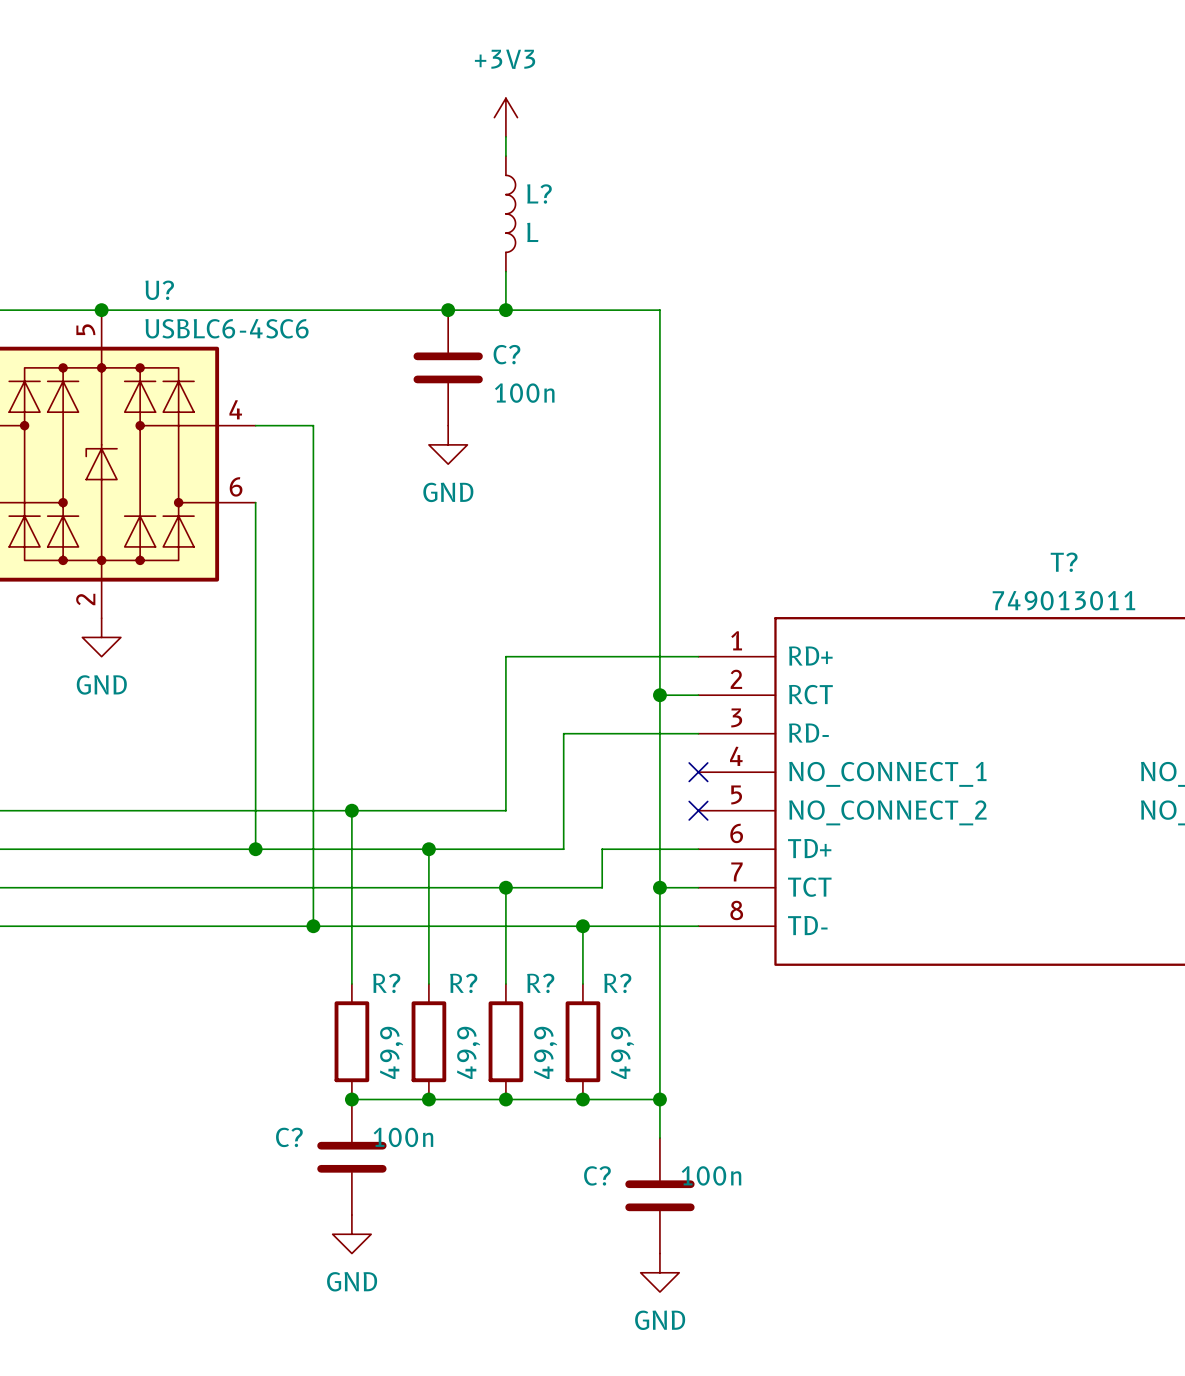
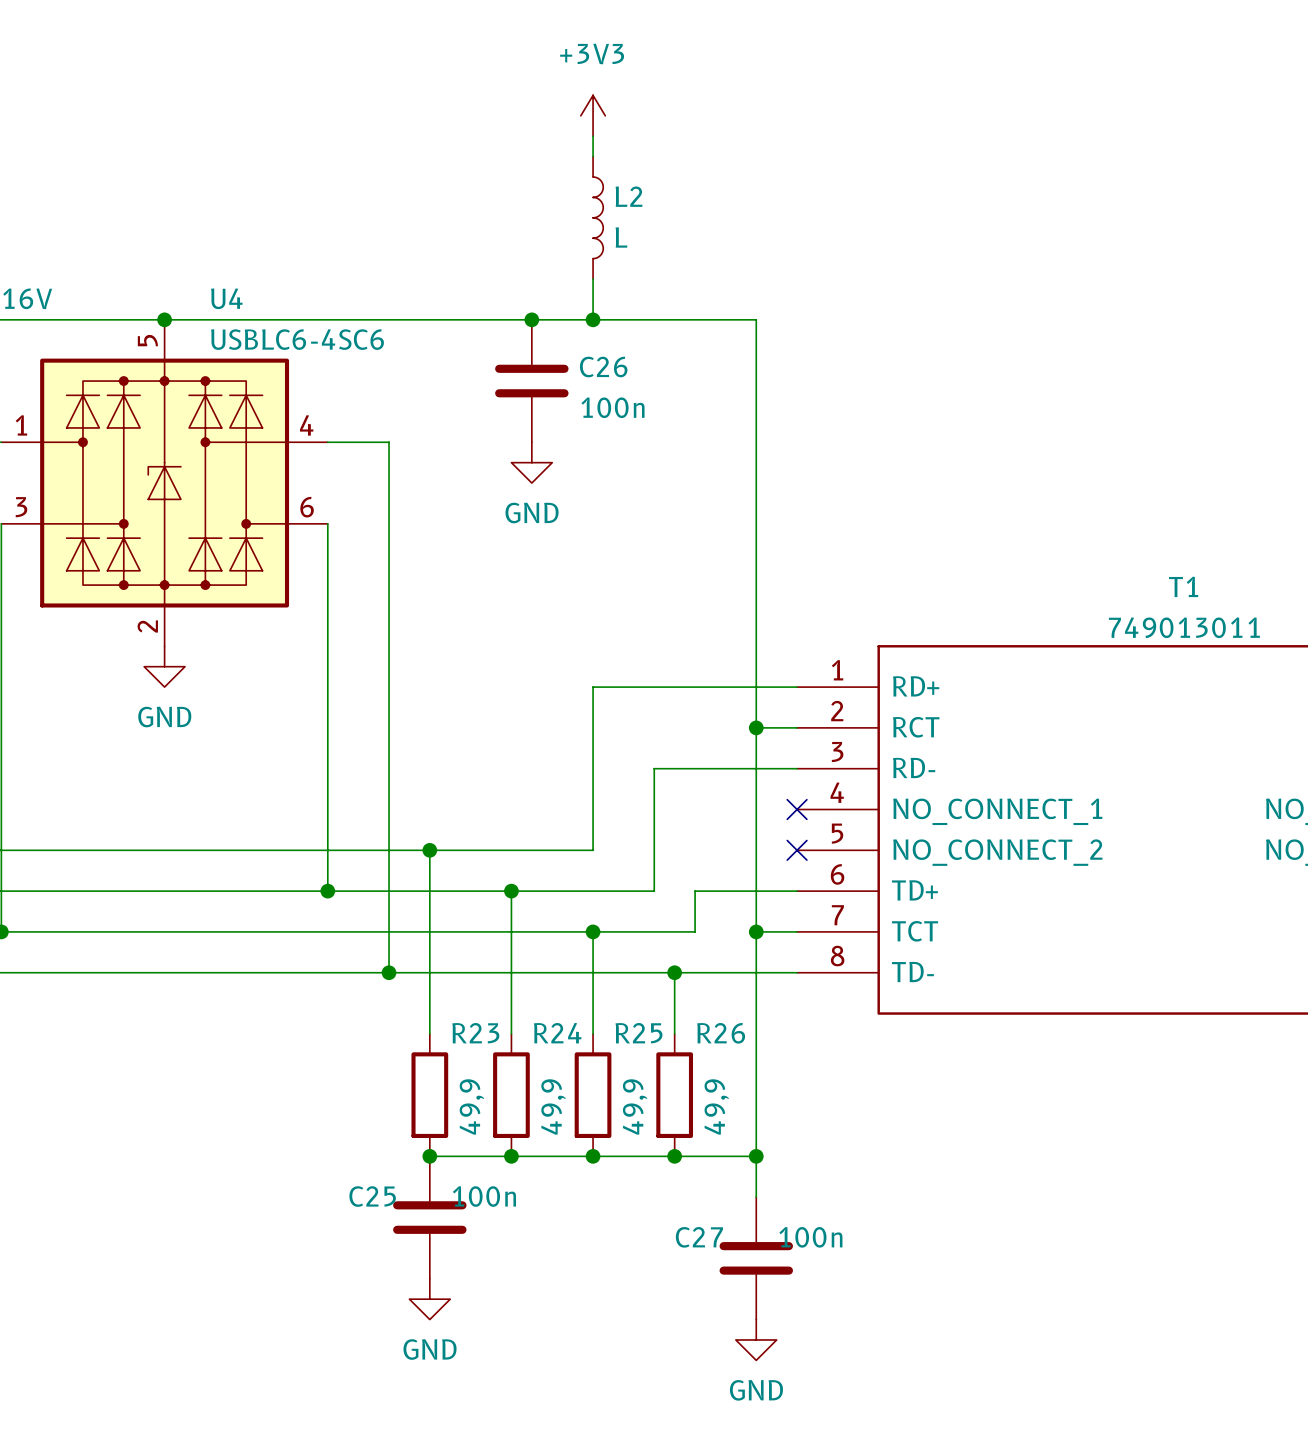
L? name: L? (539, 193) -> L2 (628, 196)
U? name: U? (159, 290) -> U4 (226, 298)
C? name: C? (506, 354) -> C26 (603, 367)
T? name: T? (1064, 562) -> T1 (1183, 586)
R? name: R? (386, 983) -> R23 (475, 1033)
R? name: R? (463, 983) -> R24 (557, 1033)
R? name: R? (540, 983) -> R25 (638, 1033)
R? name: R? (617, 983) -> R26 (721, 1033)
C? name: C? (289, 1137) -> C25 (372, 1196)
C? name: C? (597, 1175) -> C27 (699, 1237)

